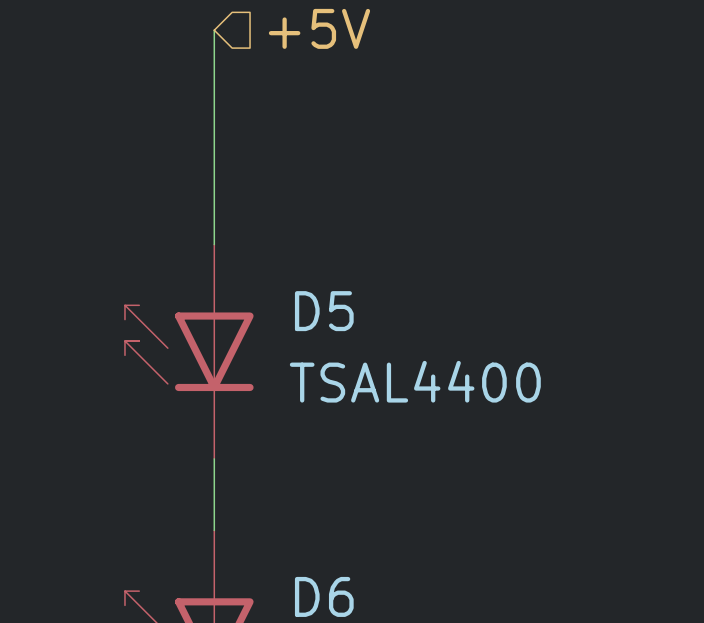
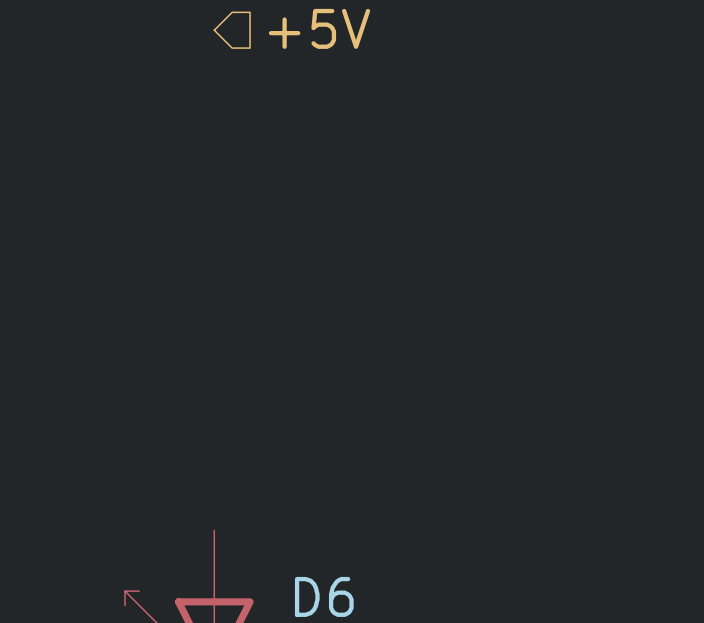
wire: (214, 30) (214, 244) -> none
D5: TSAL4400 (189, 351) -> none
wire: (214, 458) (214, 530) -> none

